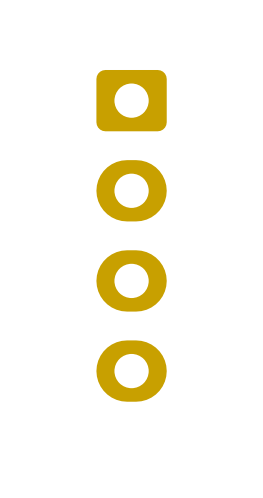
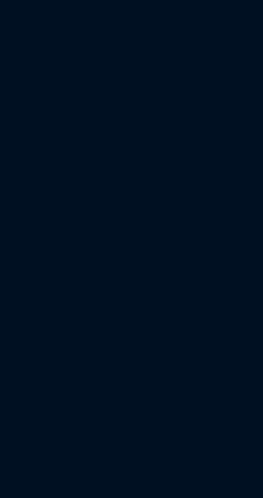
part: (131, 235) -> none

